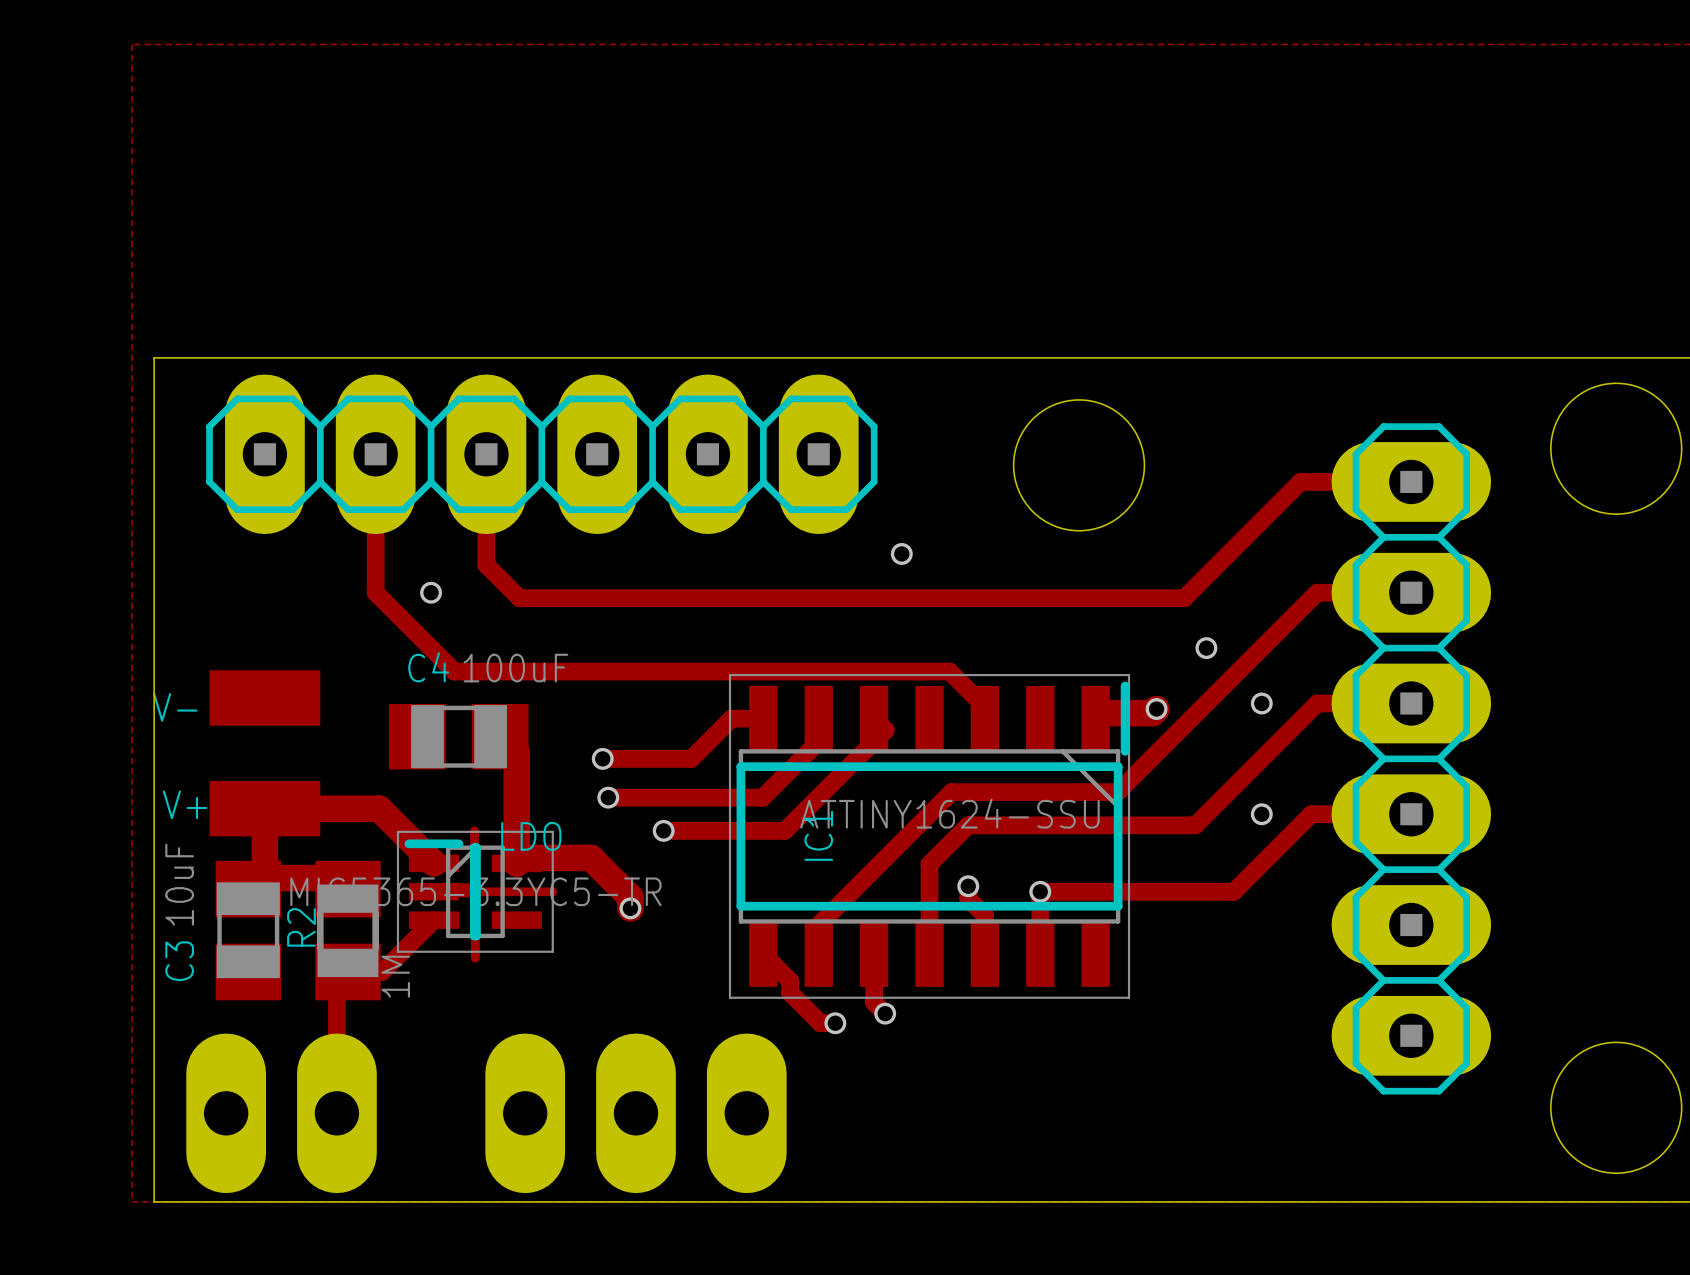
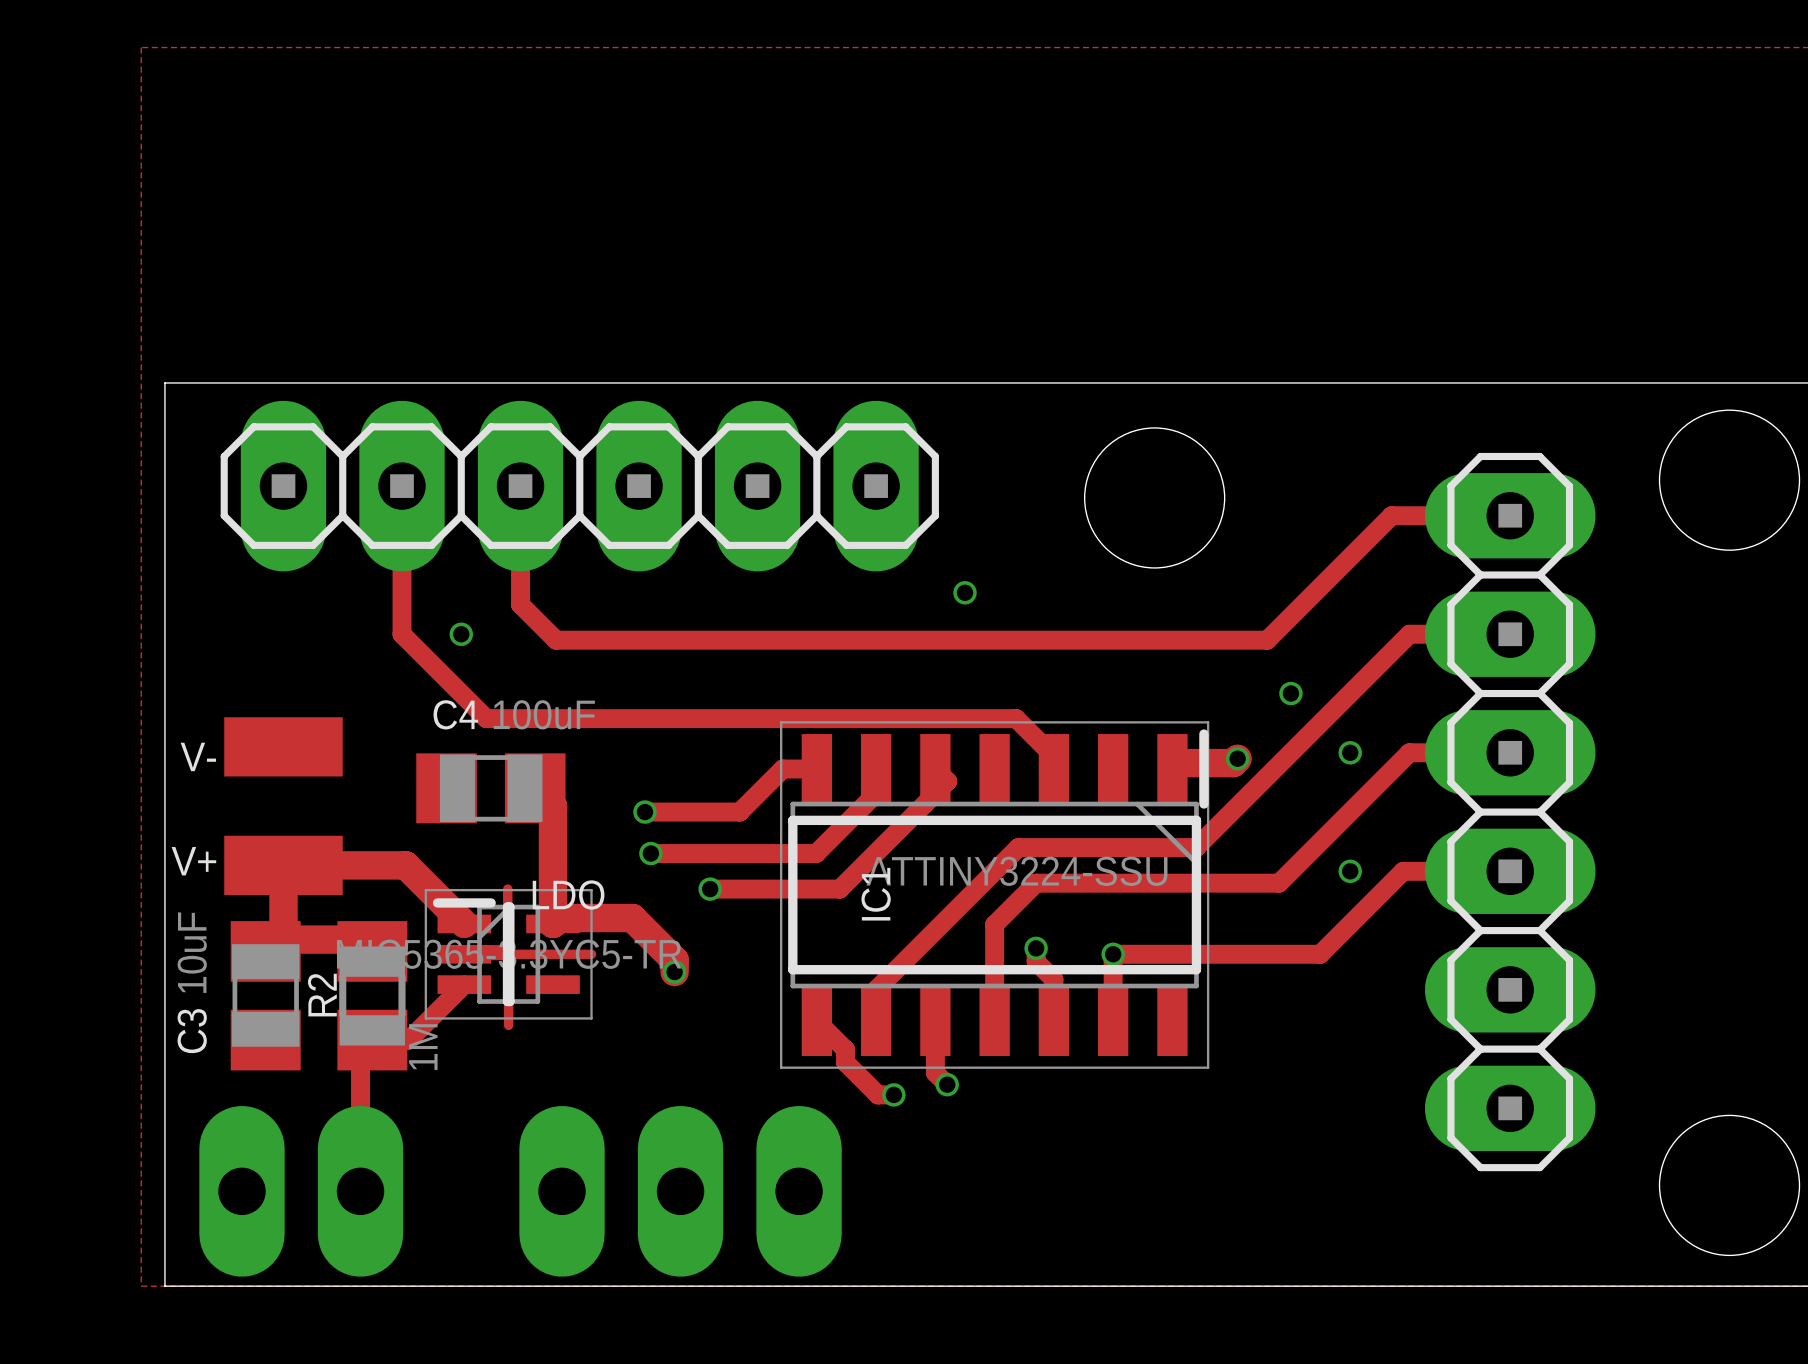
IC1 value: ATTINY1624-SSU (949, 813) -> ATTINY3224-SSU (1016, 871)

